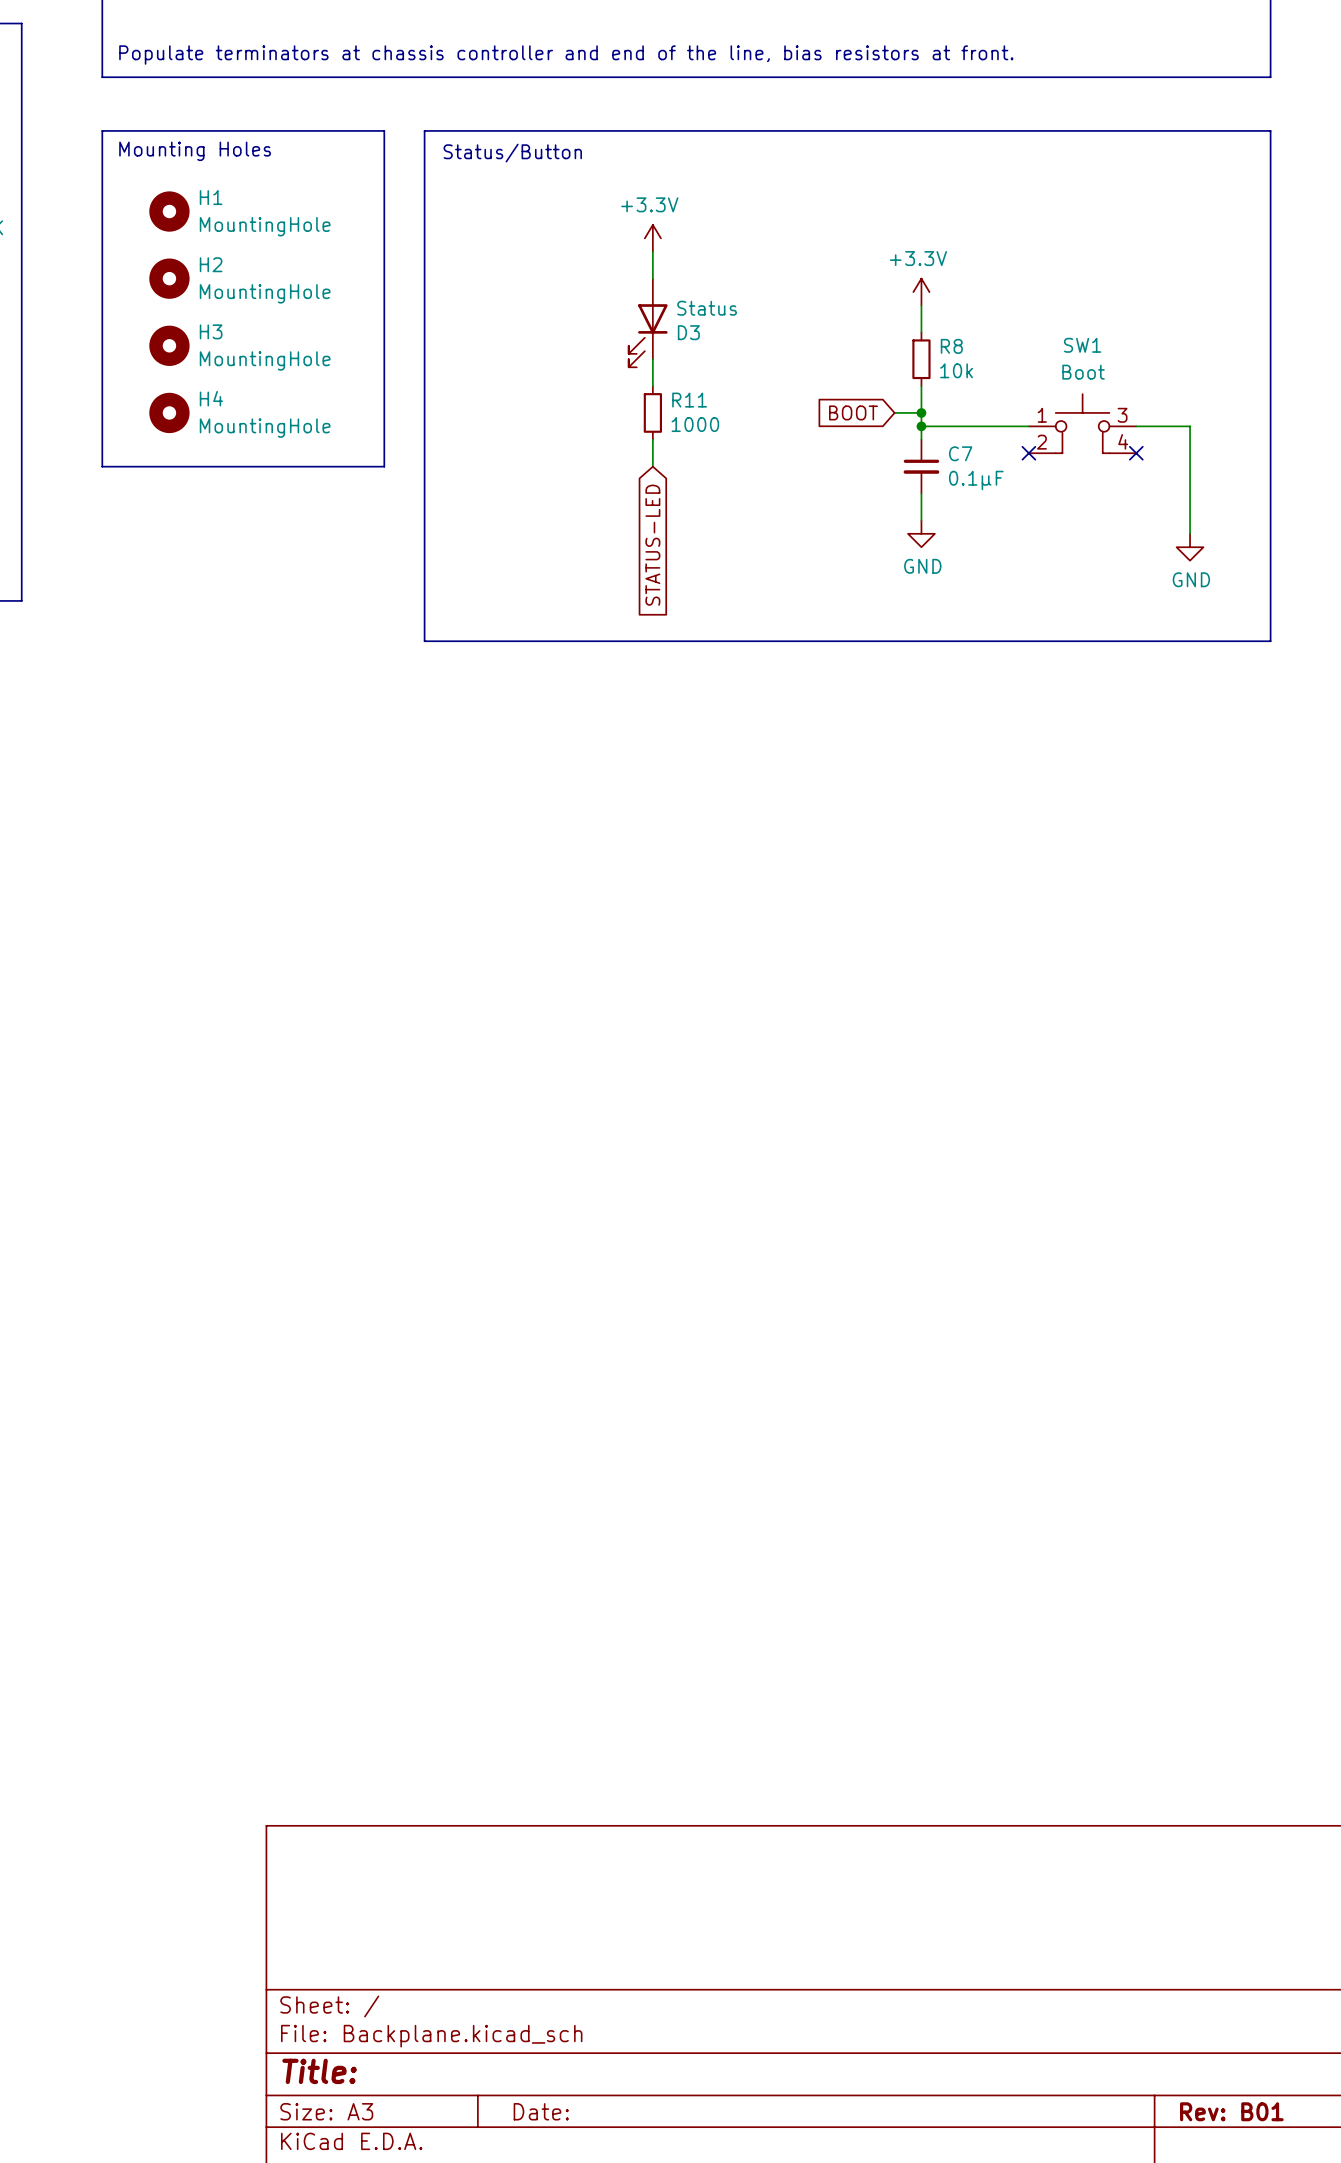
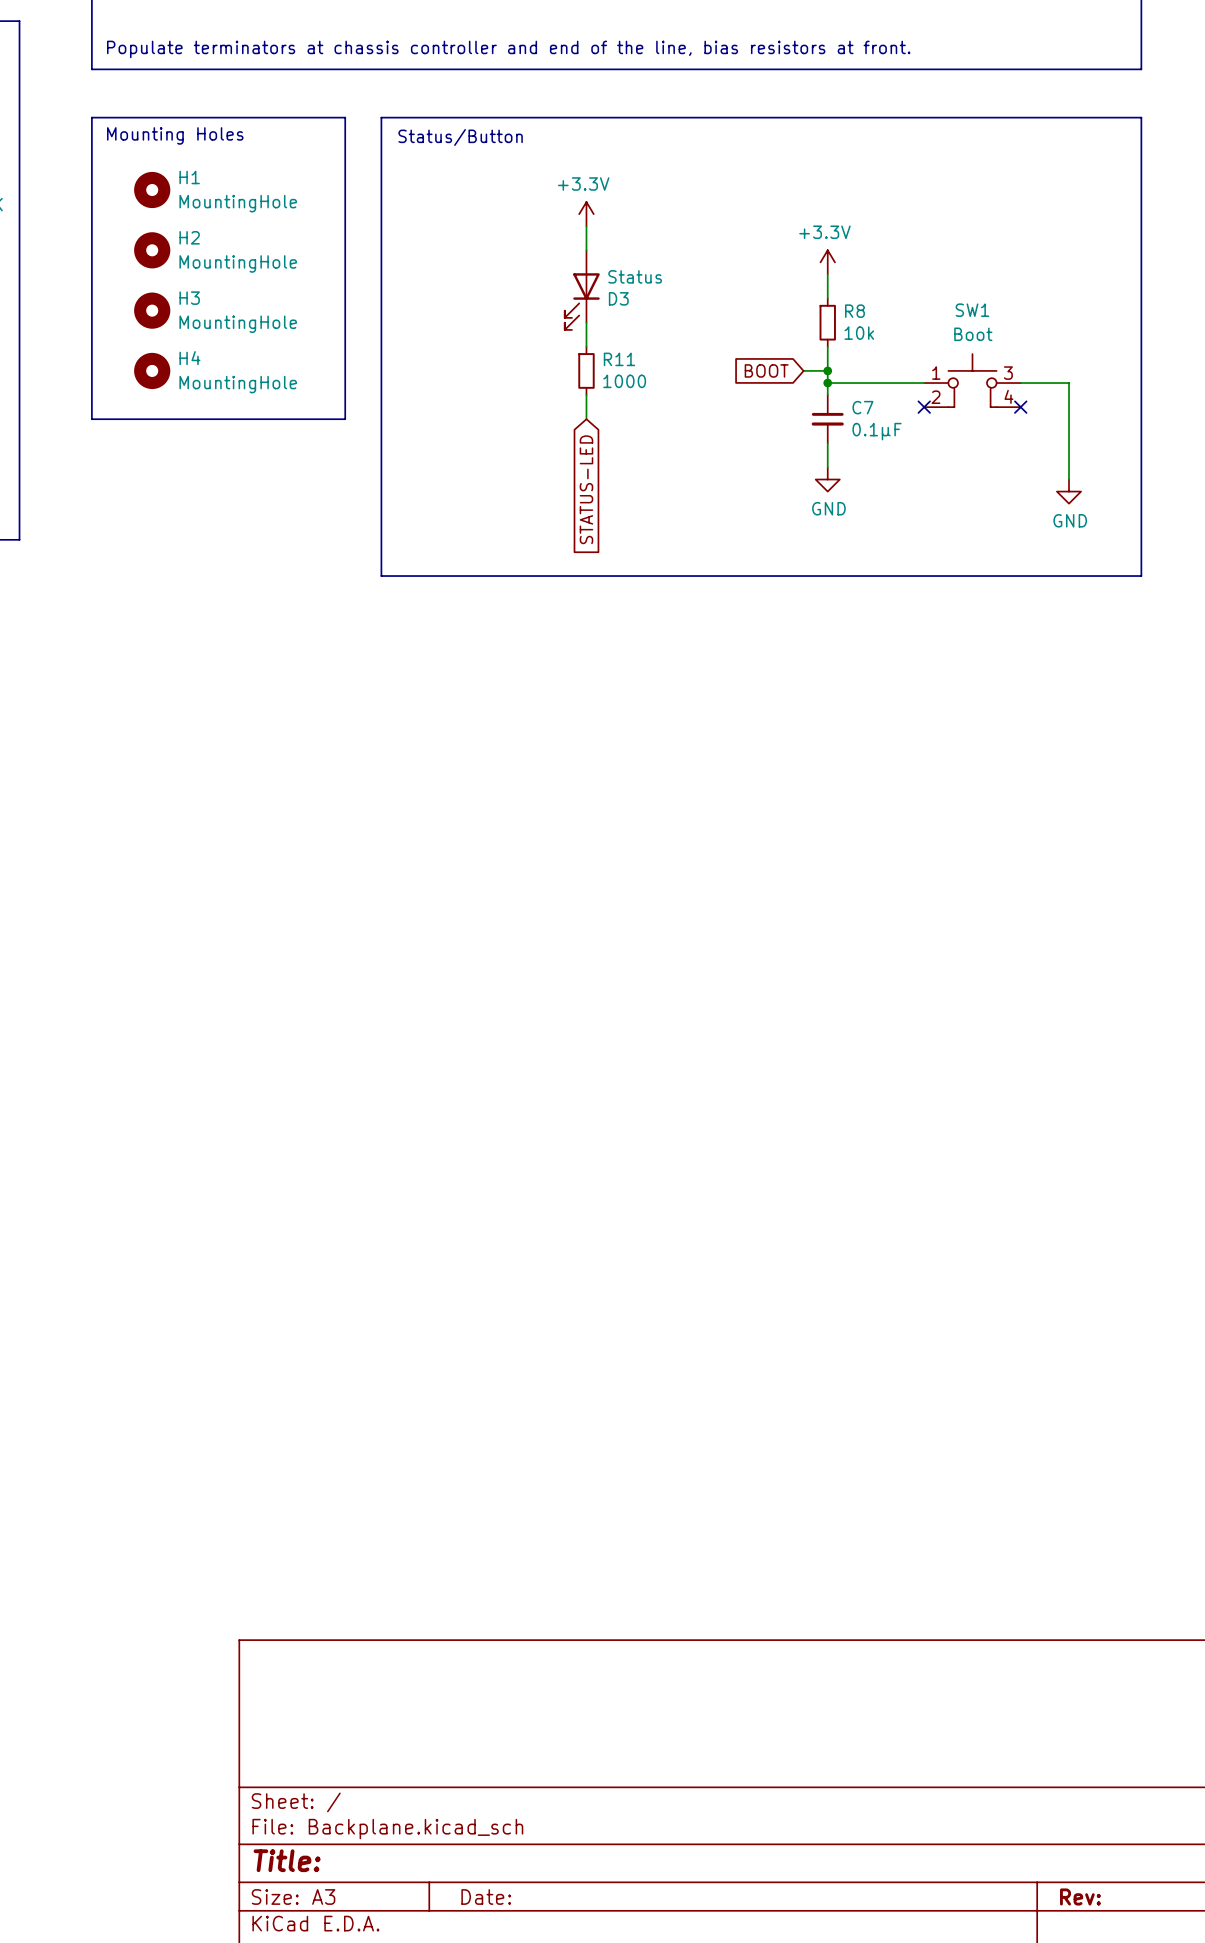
title block: Rev: B01 (1231, 2111) -> Rev: (1080, 1896)

